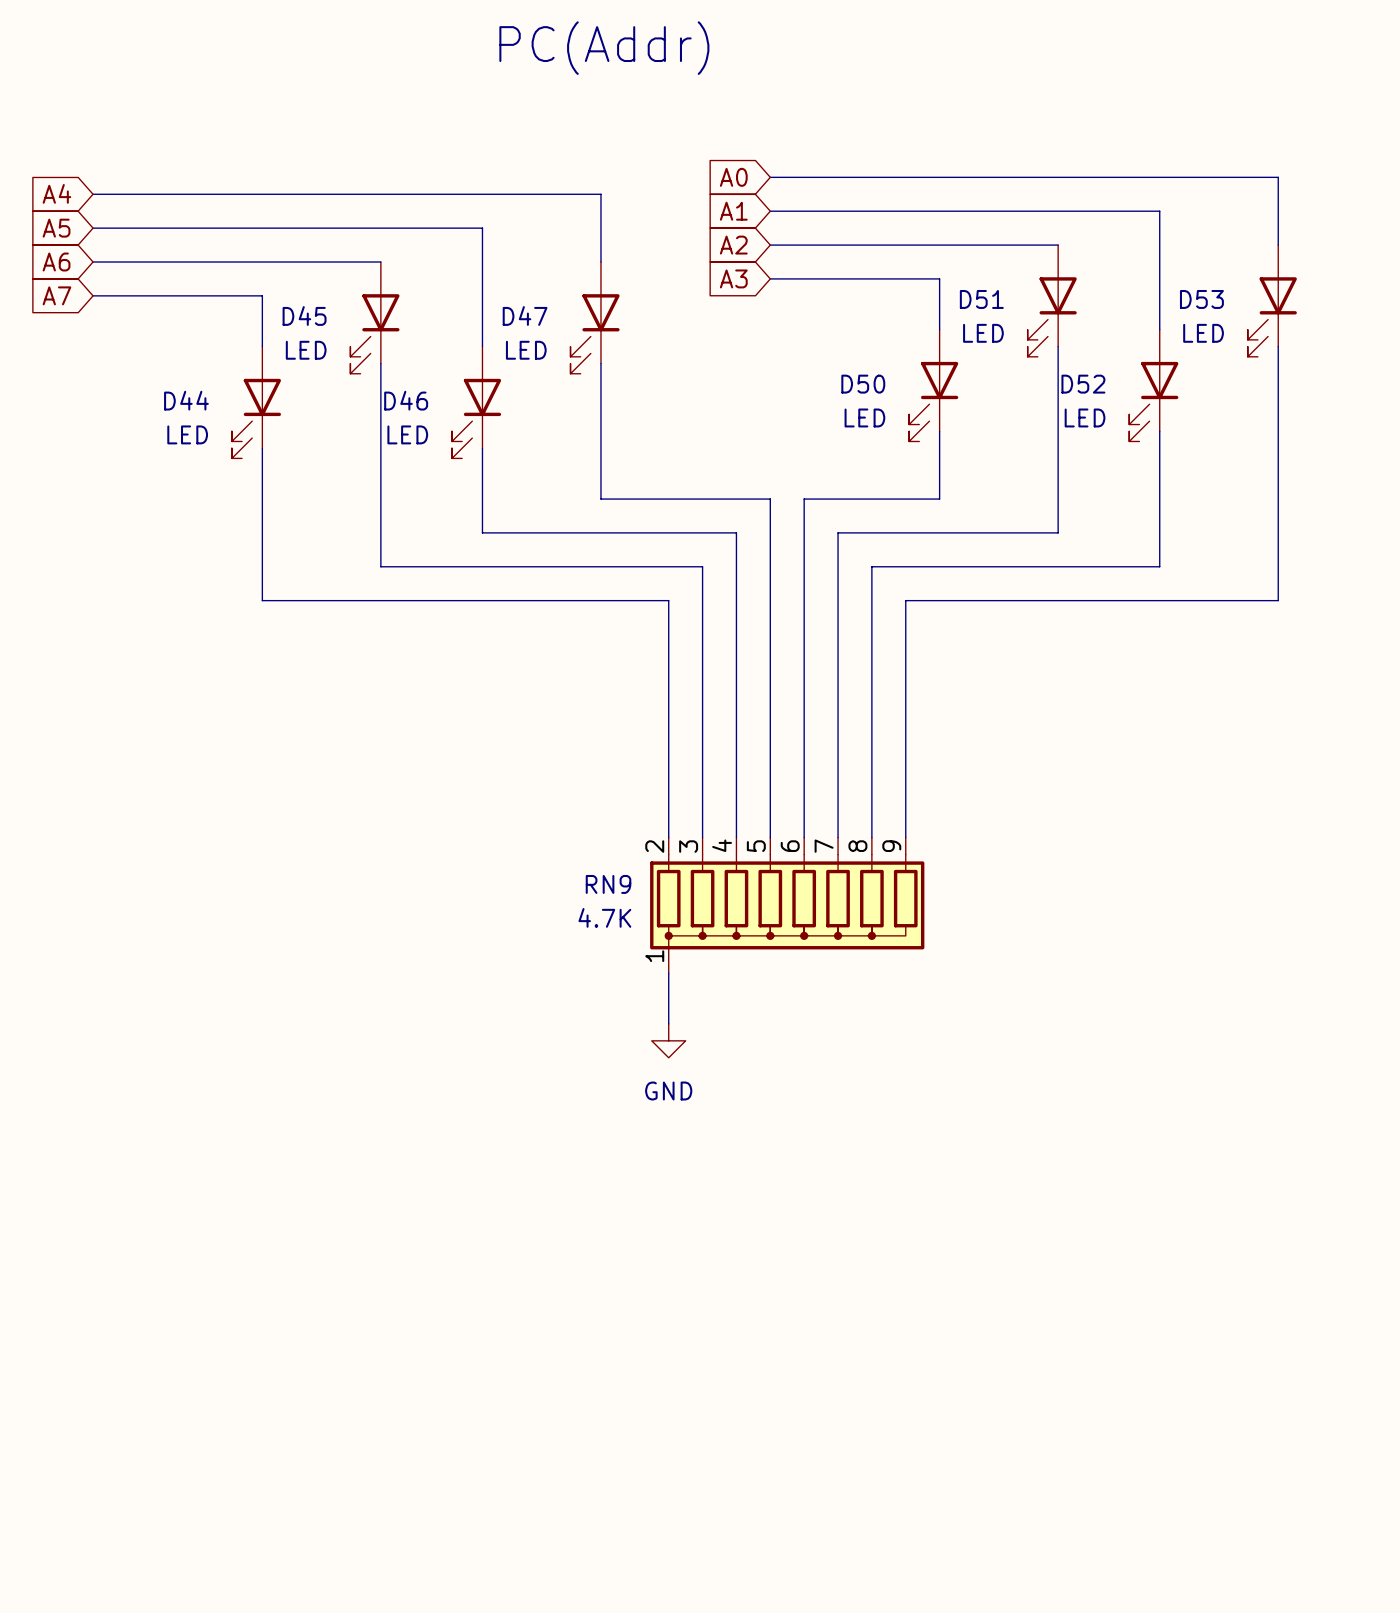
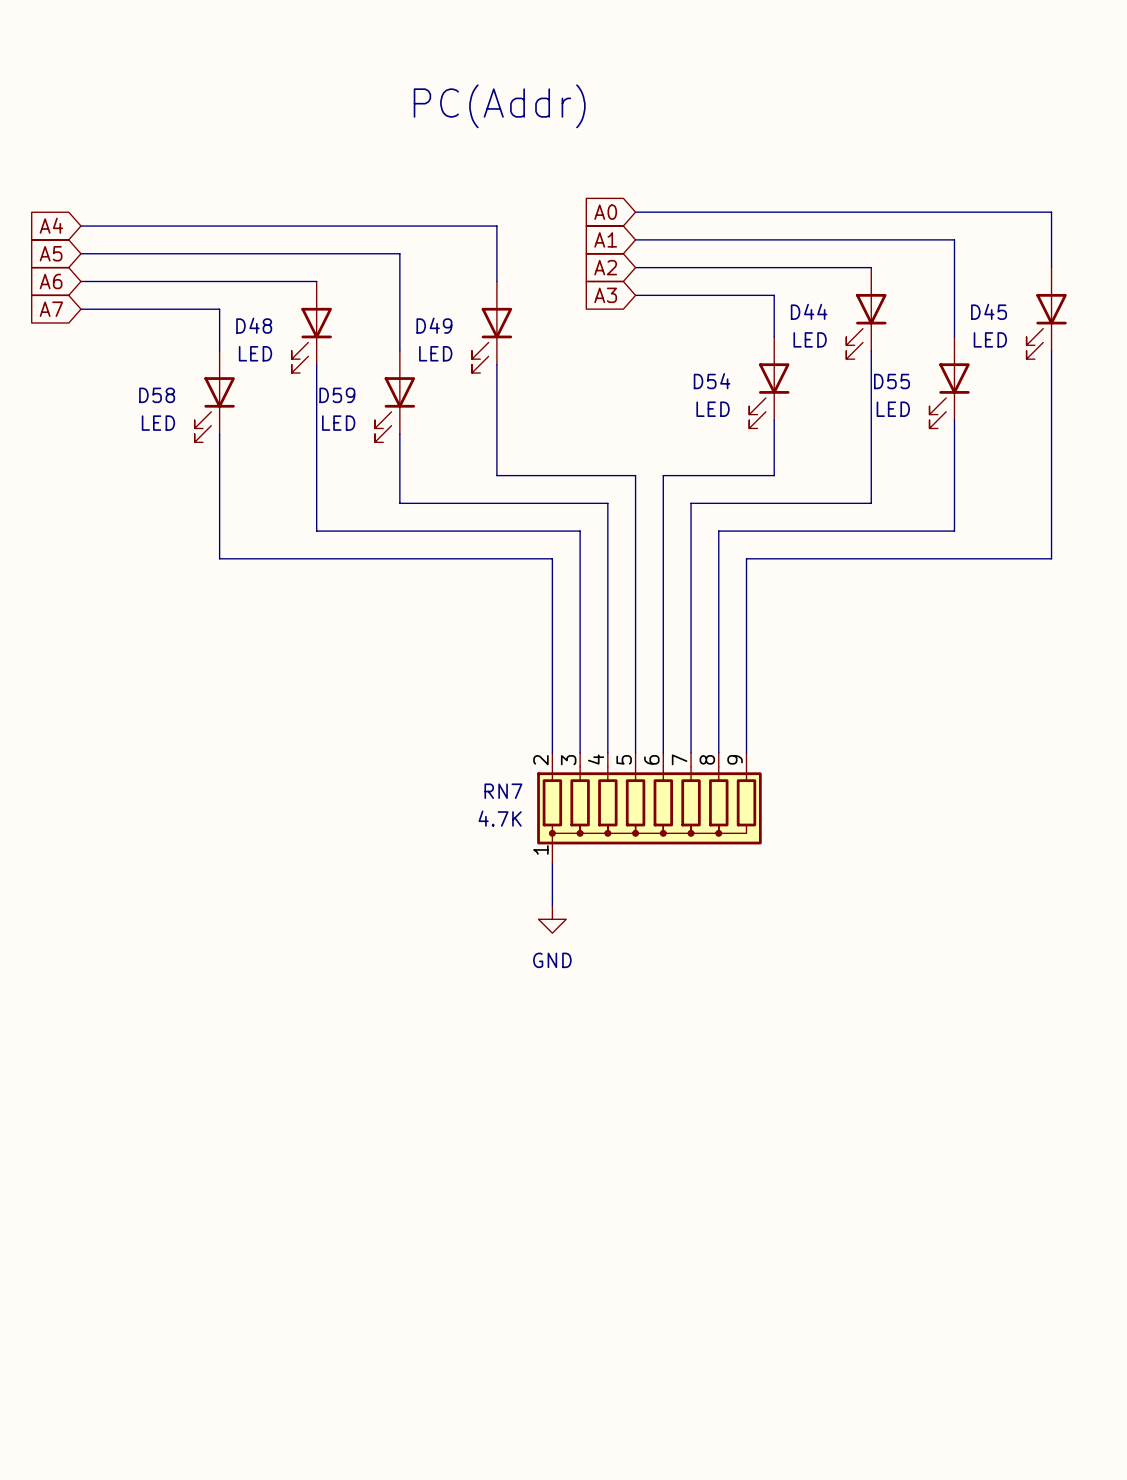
D51 name: D51 (981, 299) -> D44 (809, 311)
D53 name: D53 (1201, 299) -> D45 (989, 311)
D45 name: D45 (304, 315) -> D48 (254, 325)
D47 name: D47 (525, 315) -> D49 (434, 325)
D50 name: D50 (863, 384) -> D54 (712, 381)
D52 name: D52 (1083, 384) -> D55 (891, 381)
D44 name: D44 (186, 400) -> D58 (157, 395)
D46 name: D46 (406, 400) -> D59 (337, 395)
RN9 name: RN9 (608, 884) -> RN7 (503, 791)

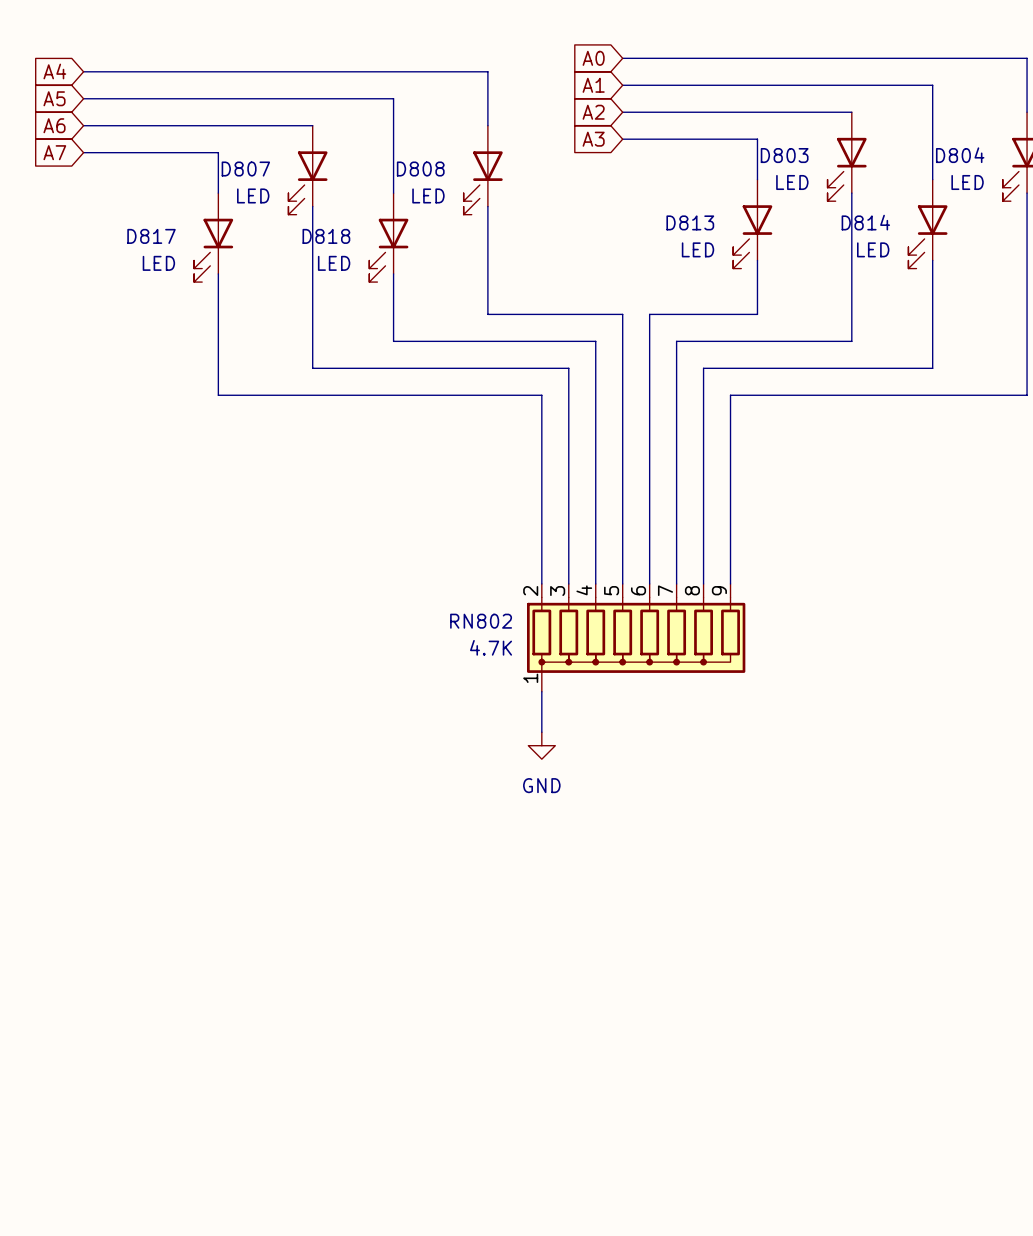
D44 name: D44 (809, 311) -> D803 (784, 155)
D45 name: D45 (989, 311) -> D804 (960, 155)
D48 name: D48 (254, 325) -> D807 (245, 169)
D49 name: D49 (434, 325) -> D808 (420, 169)
D54 name: D54 (712, 381) -> D813 (690, 222)
D55 name: D55 (891, 381) -> D814 (865, 222)
D58 name: D58 (157, 395) -> D817 (151, 236)
D59 name: D59 (337, 395) -> D818 (326, 236)
RN7 name: RN7 (503, 791) -> RN802 (481, 621)

